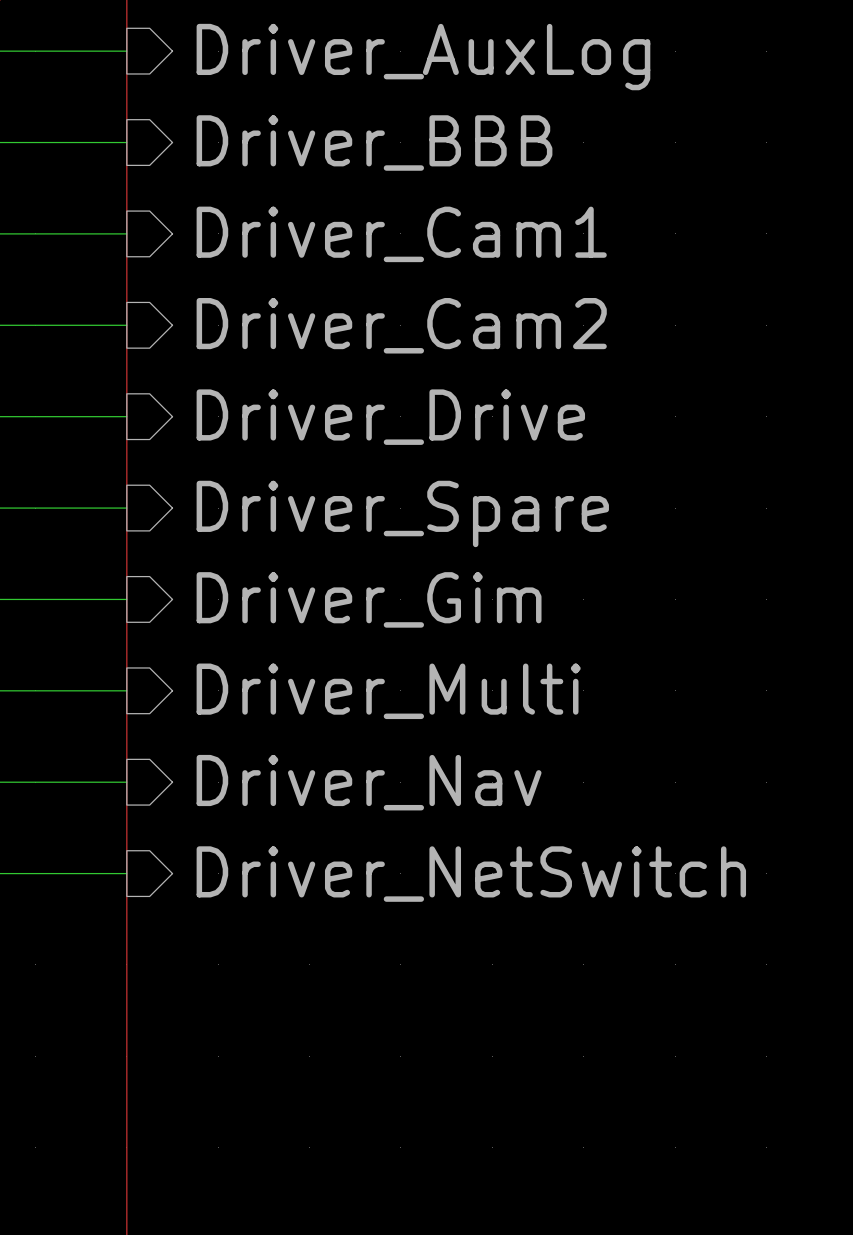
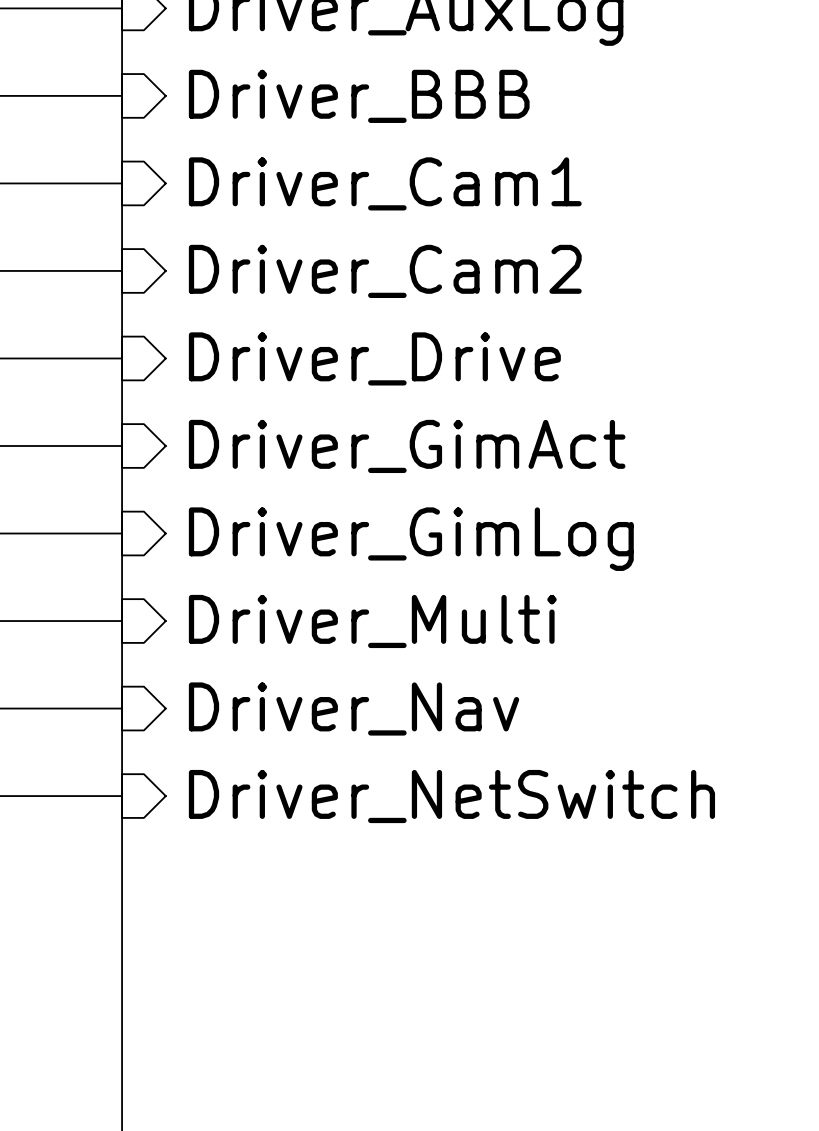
sheet pin: Driver_Spare (402, 513) -> Driver_GimAct (407, 446)
sheet pin: Driver_Gim (369, 599) -> Driver_GimLog (411, 539)

